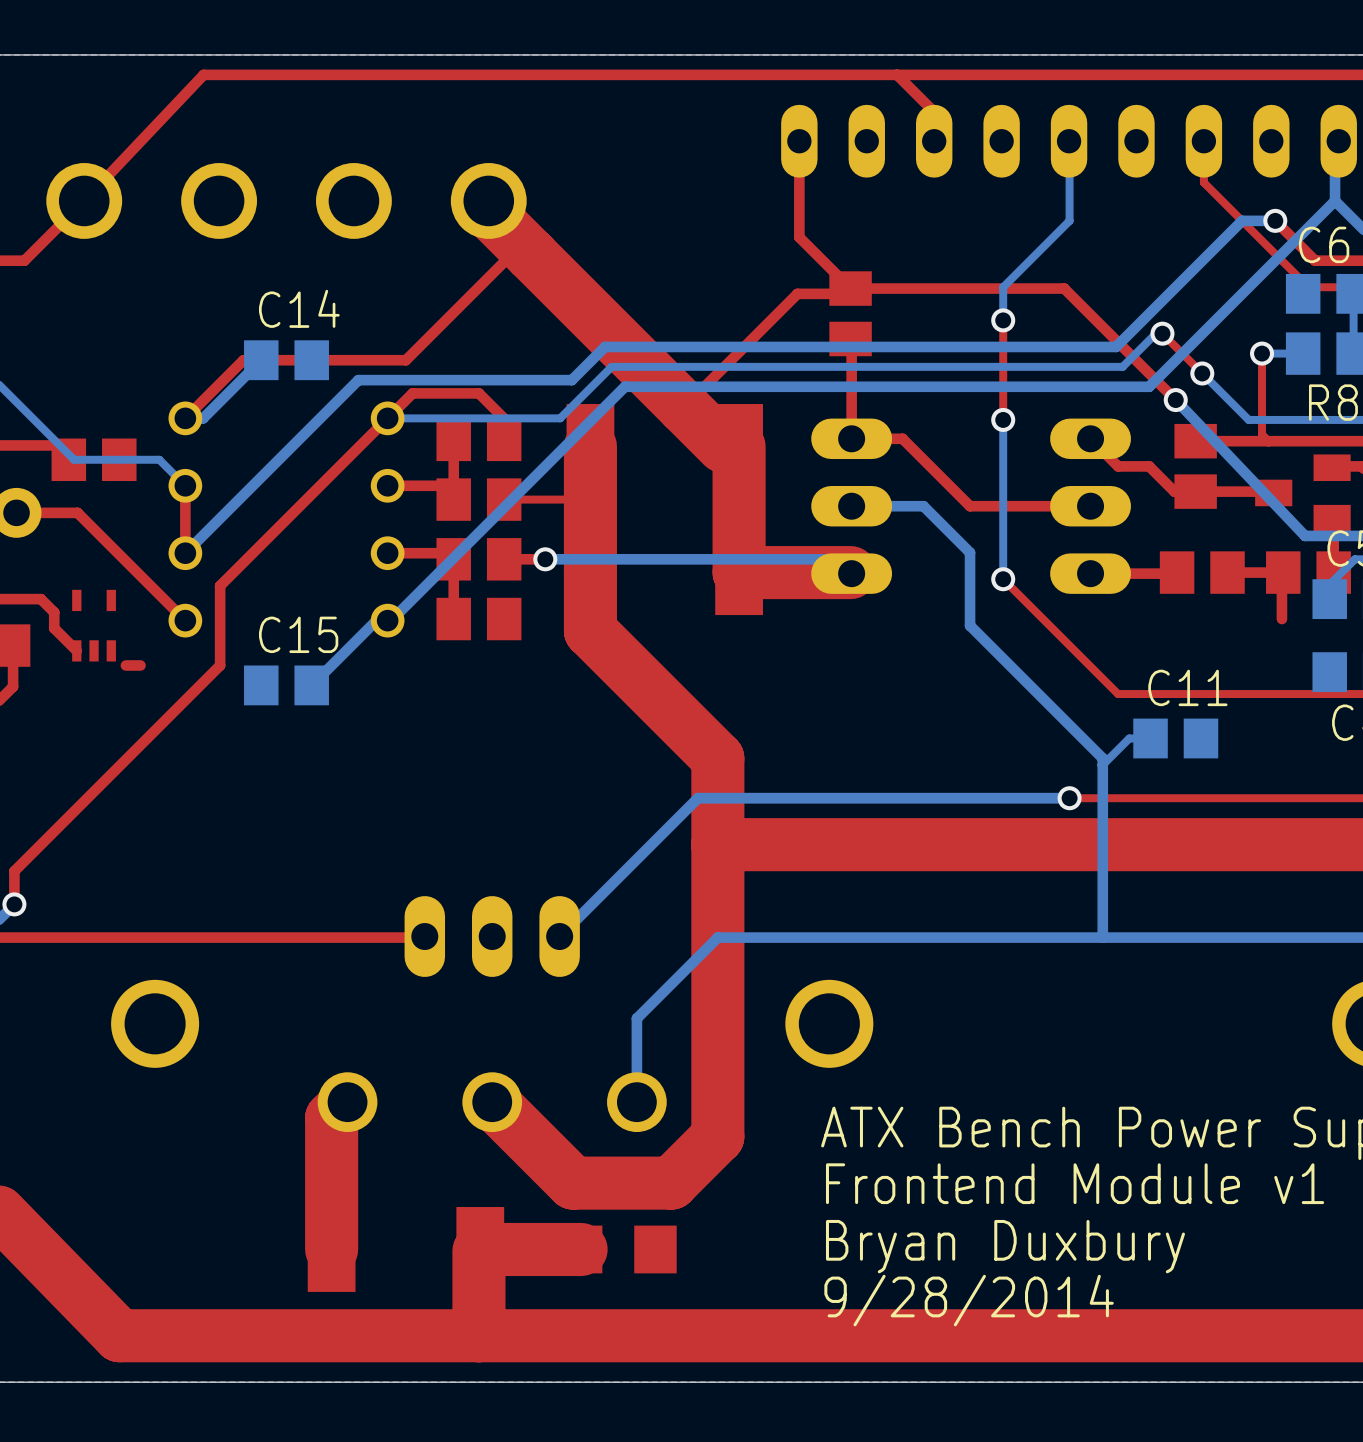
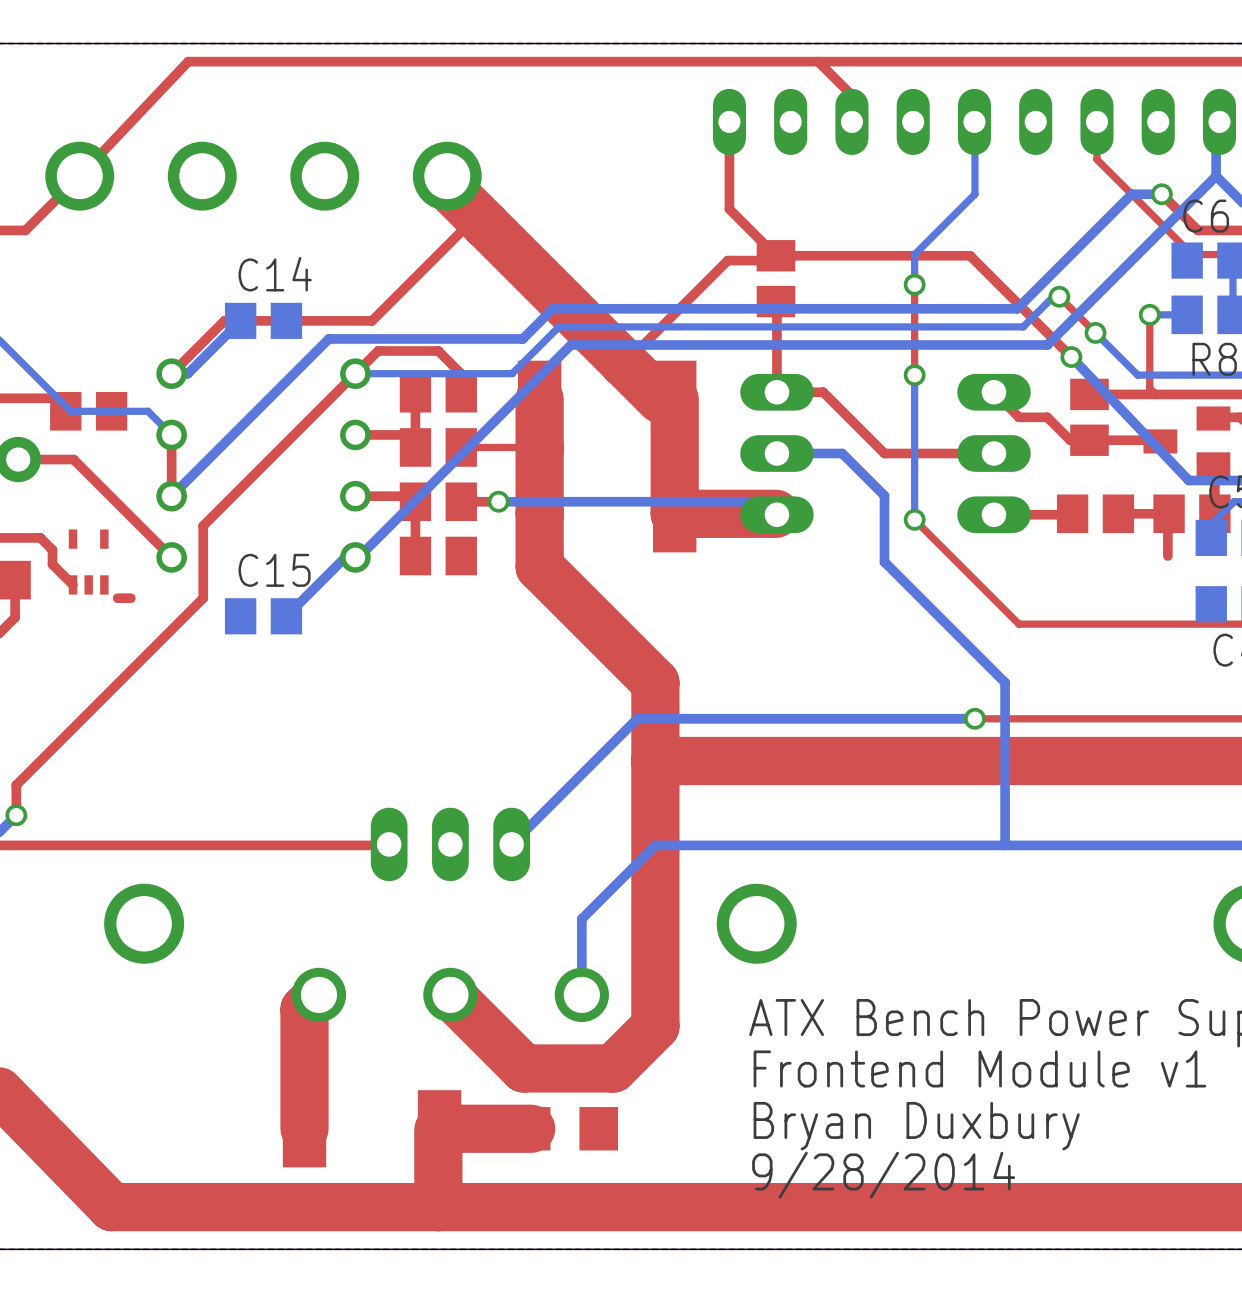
bottom track: (1150, 738) (1129, 738) (1102, 765) -> none
C11: (1175, 738) -> none

